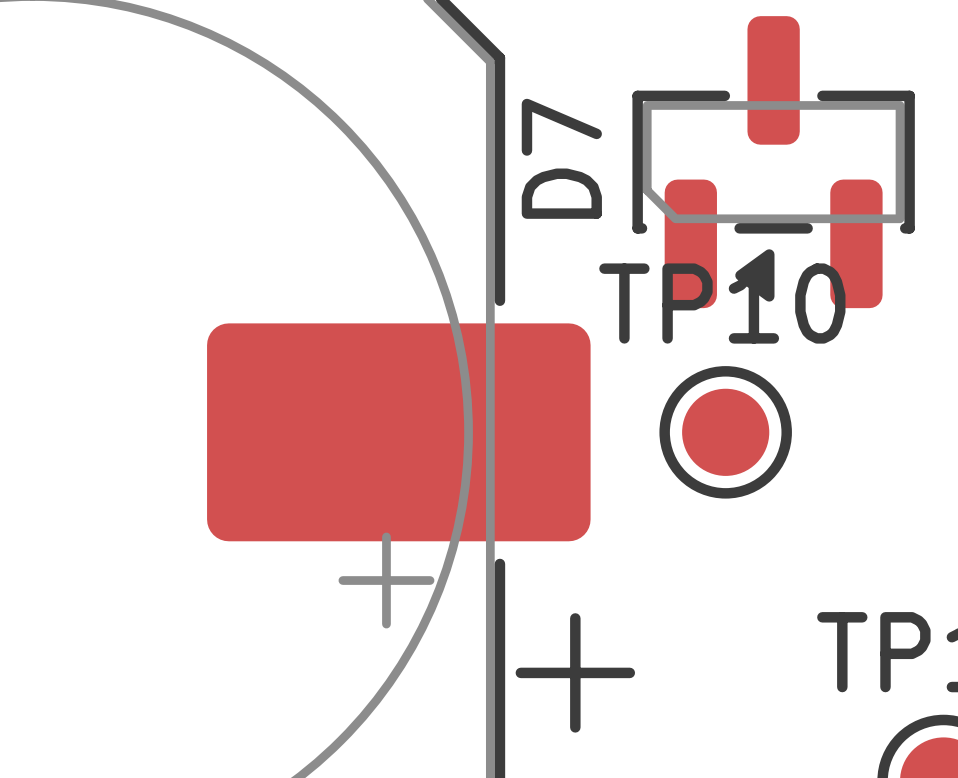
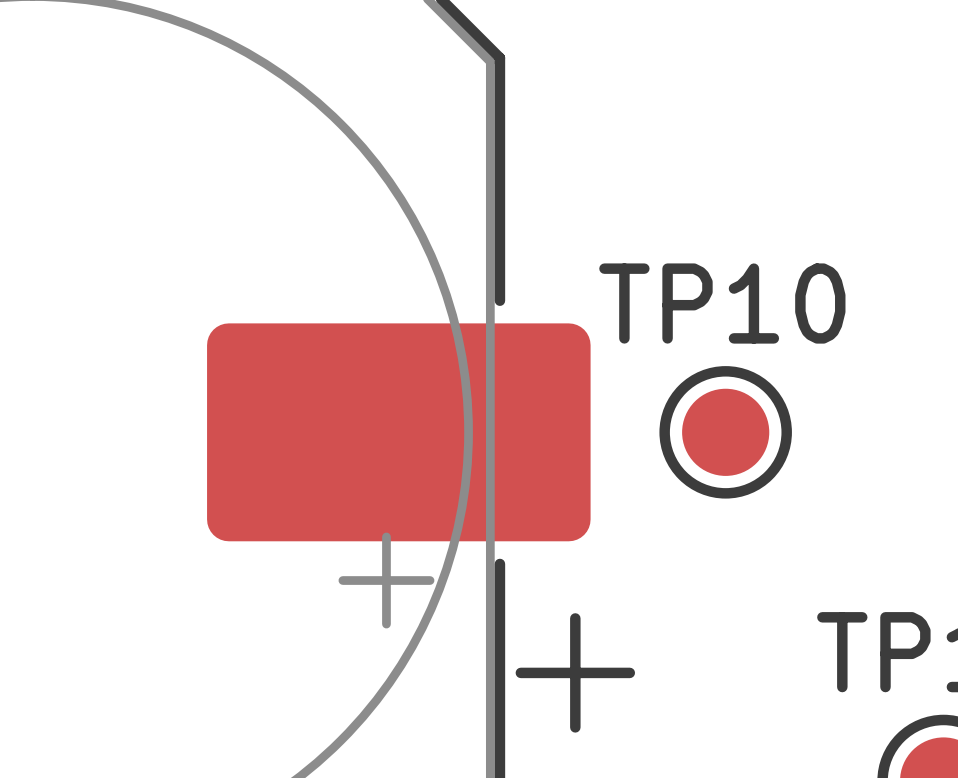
D7: (773, 162) -> none

